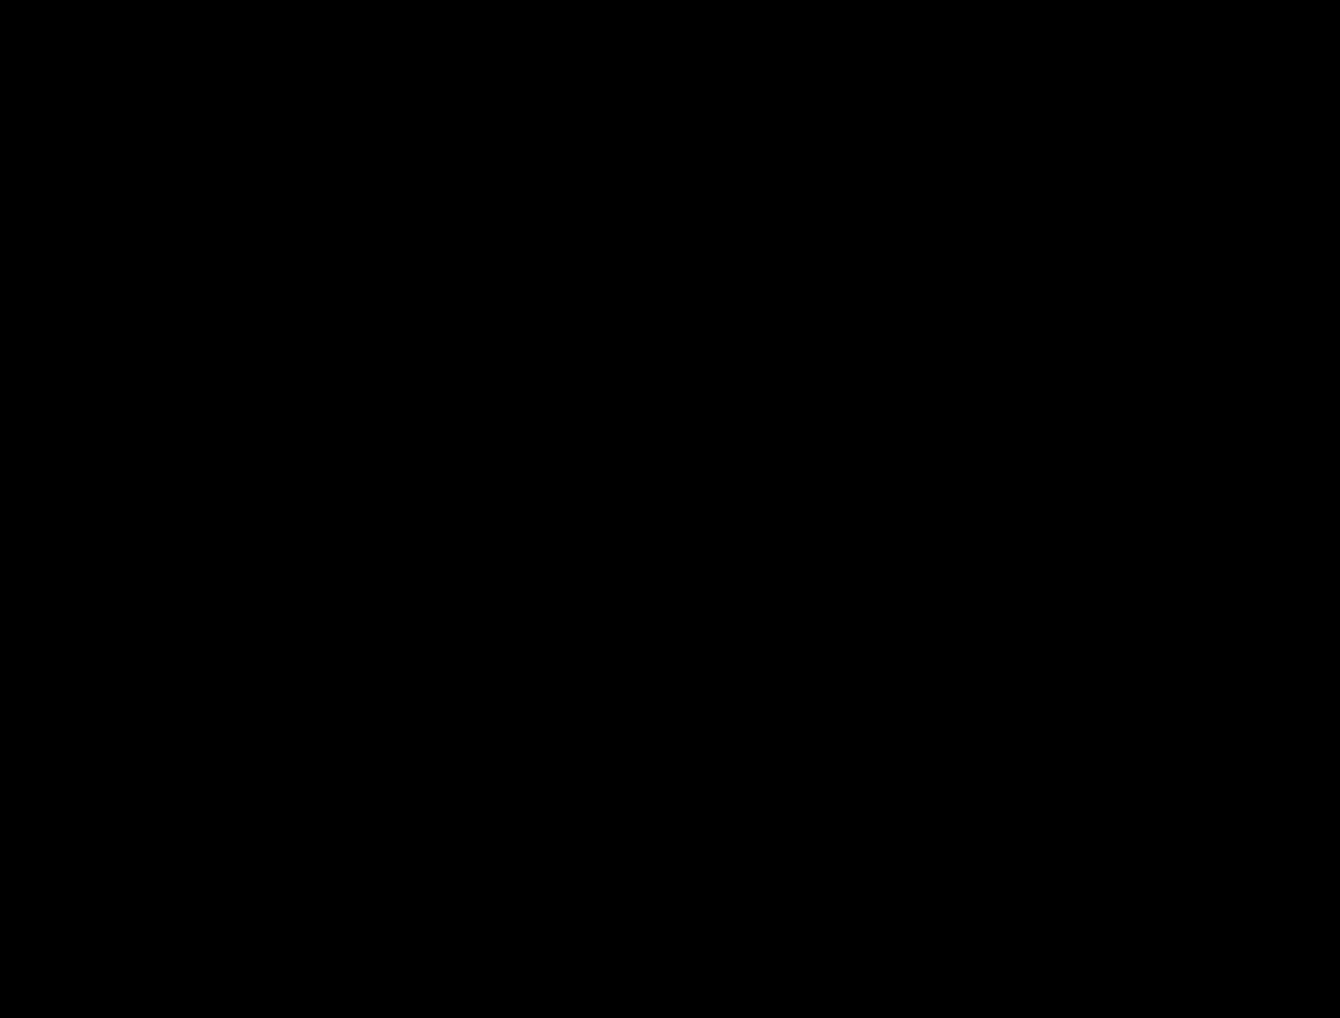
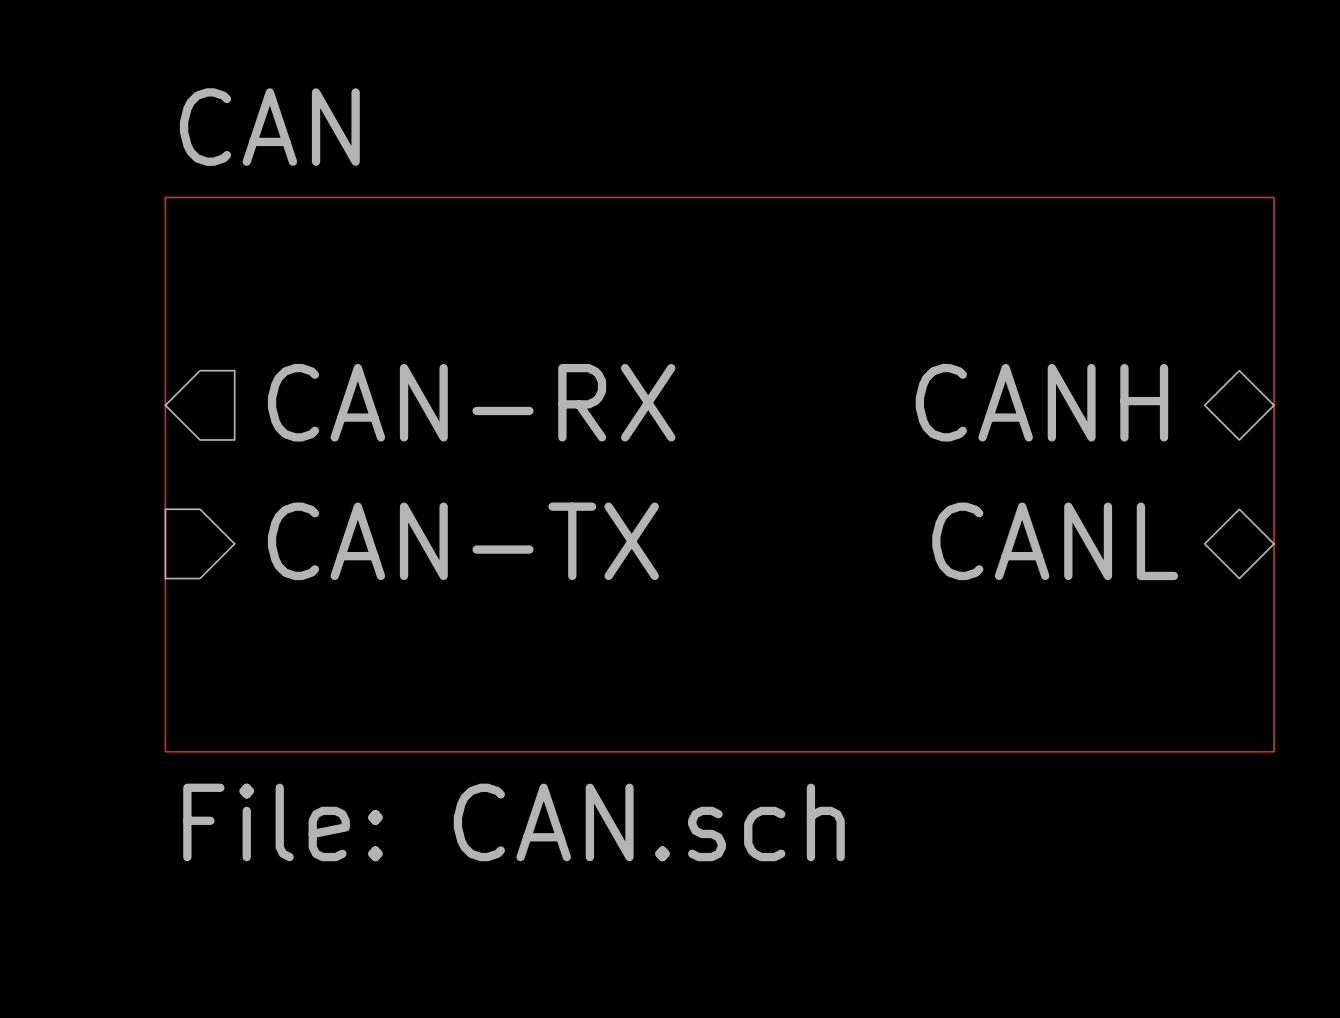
sheet pin: none -> CAN-RX (471, 402)
sheet pin: none -> CANH (1041, 402)
sheet CAN: none -> File: CAN.sch (719, 474)
sheet pin: none -> CAN-TX (463, 541)
sheet pin: none -> CANL (1055, 541)

